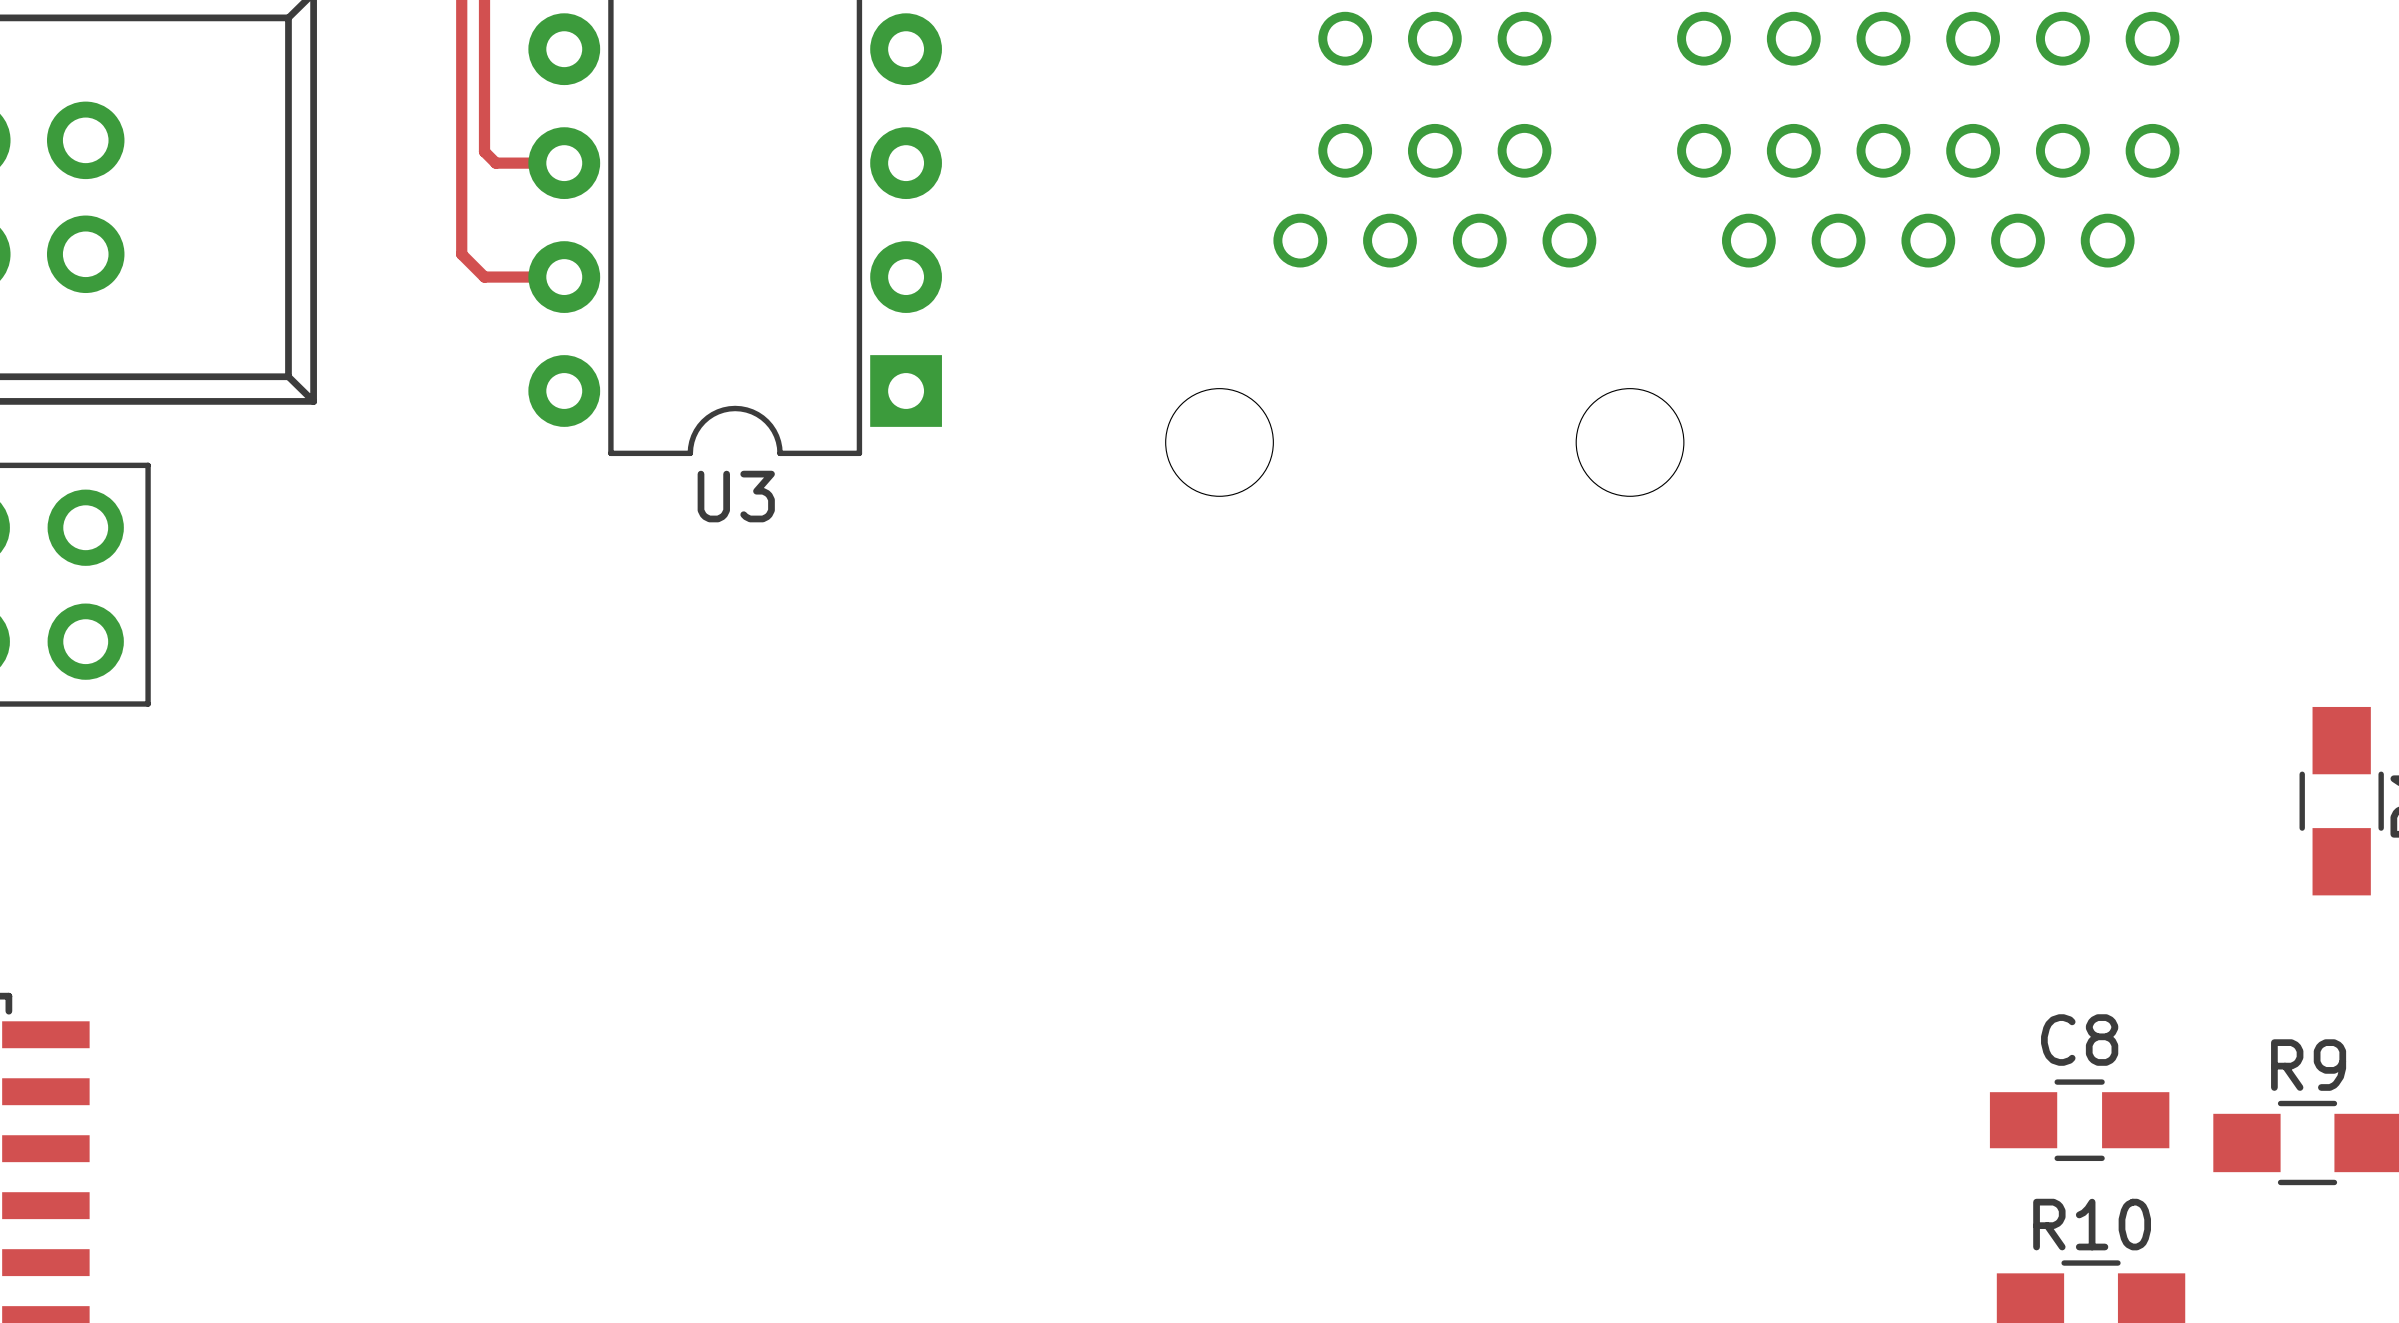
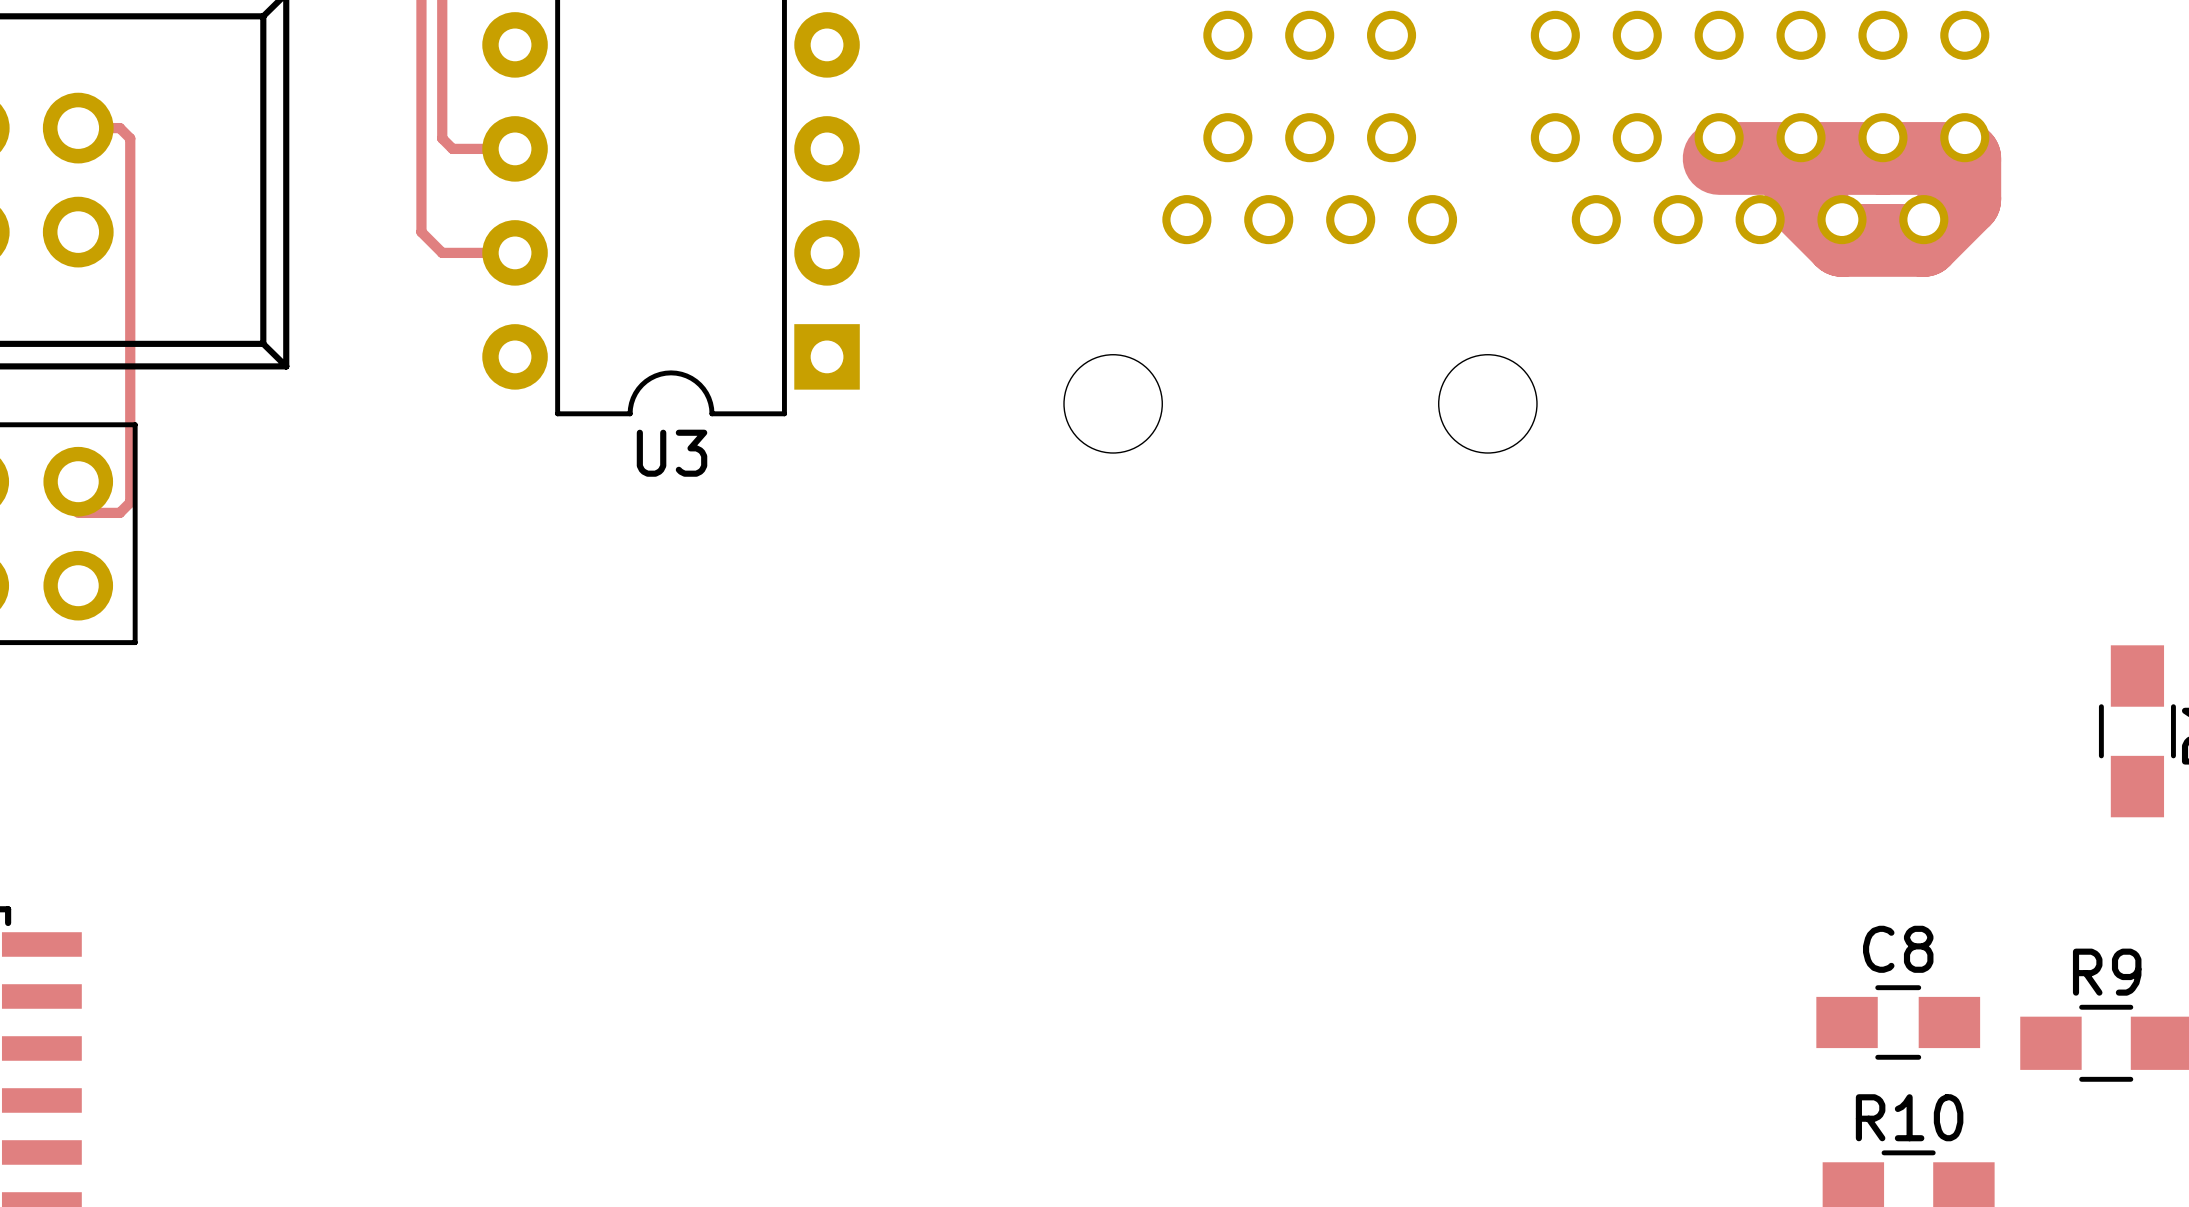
track: none -> (78, 128) (119, 128) (130, 138) (130, 502) (119, 512) (78, 512)
track: none -> (1719, 158) (1964, 158) (1964, 199) (1923, 240) (1841, 240) (1800, 199) (1800, 158)

